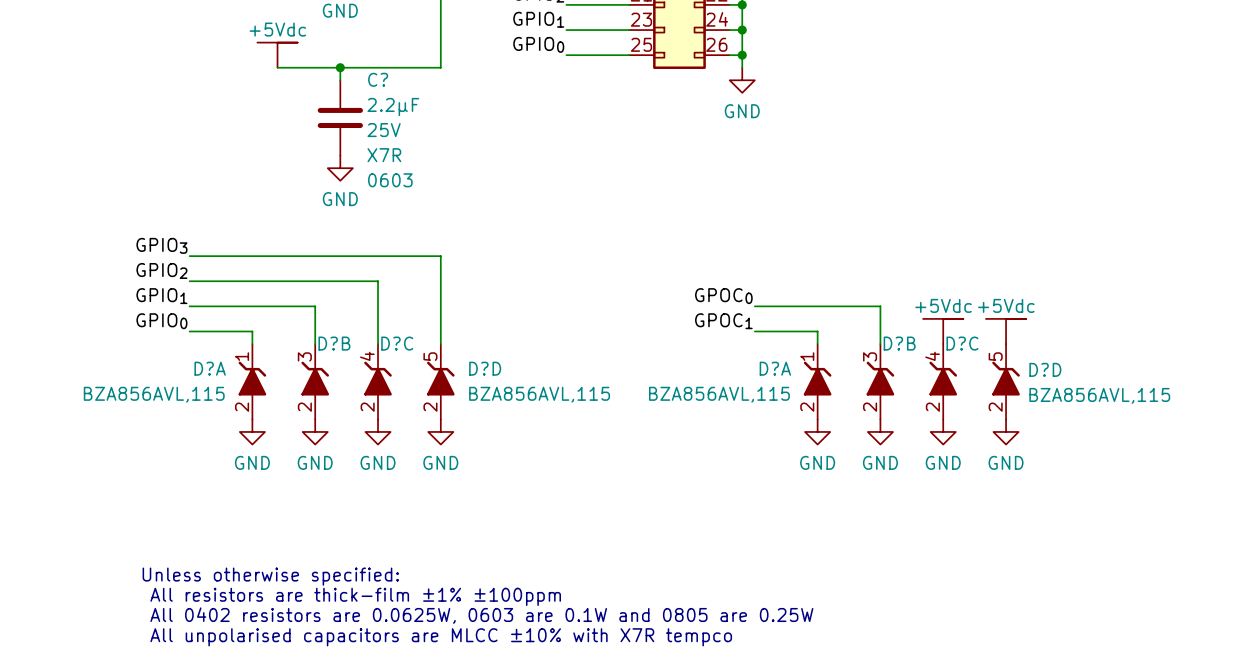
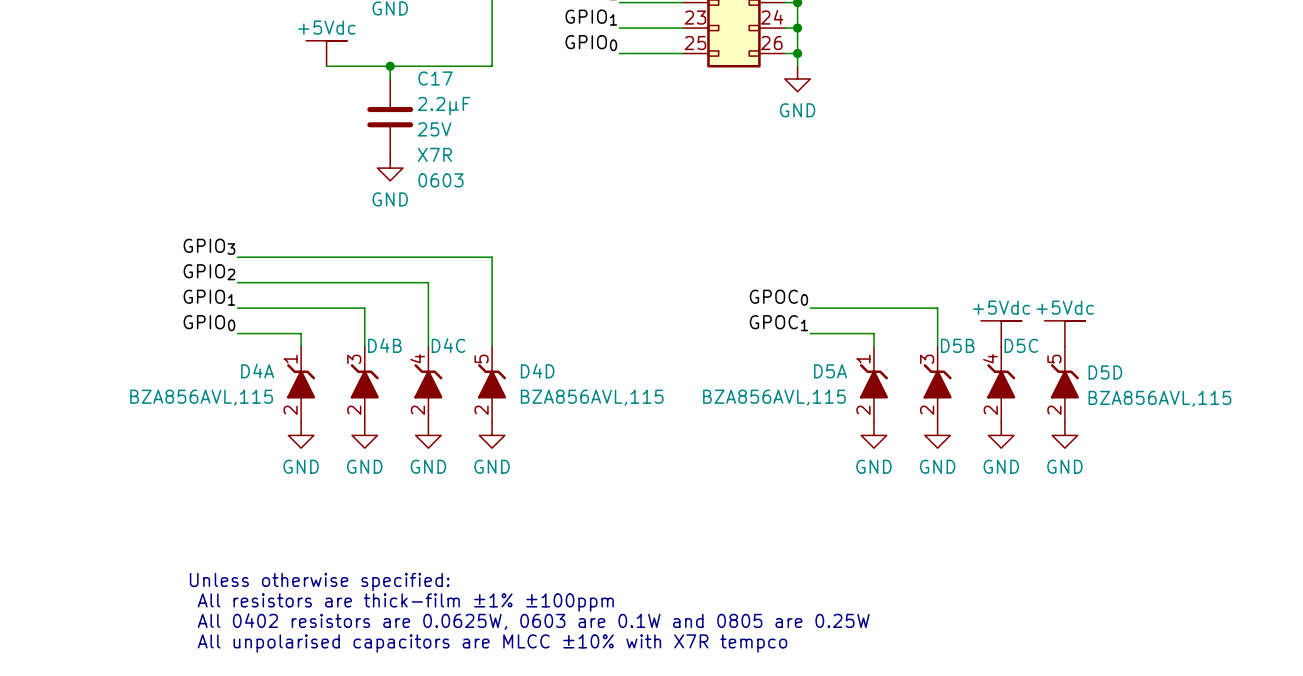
C? name: C? (378, 79) -> C17 (435, 78)
D?B name: D?B (334, 343) -> D4B (384, 345)
D?C name: D?C (397, 343) -> D4C (448, 345)
D?B name: D?B (899, 343) -> D5B (957, 345)
D?C name: D?C (962, 343) -> D5C (1021, 345)
D?A name: D?A (210, 368) -> D4A (257, 370)
D?D name: D?D (485, 368) -> D4D (537, 370)
D?A name: D?A (775, 368) -> D5A (830, 371)
D?D name: D?D (1045, 369) -> D5D (1105, 372)

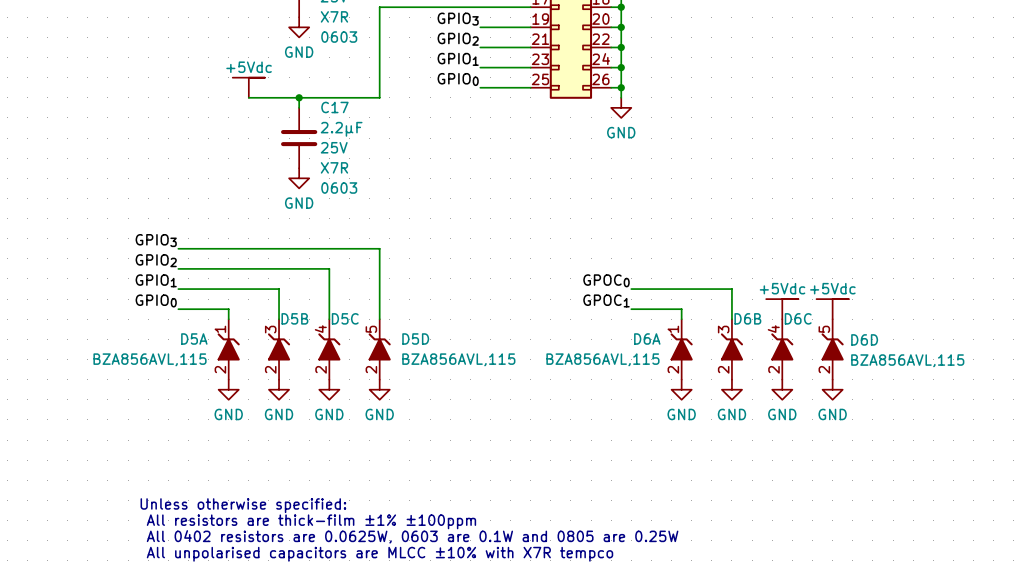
D4B name: D4B (384, 345) -> D5B (294, 318)
D4C name: D4C (448, 345) -> D5C (345, 318)
D5B name: D5B (957, 345) -> D6B (747, 318)
D5C name: D5C (1021, 345) -> D6C (798, 318)
D4A name: D4A (257, 370) -> D5A (194, 339)
D4D name: D4D (537, 370) -> D5D (415, 339)
D5A name: D5A (830, 371) -> D6A (647, 339)
D5D name: D5D (1105, 372) -> D6D (864, 339)

